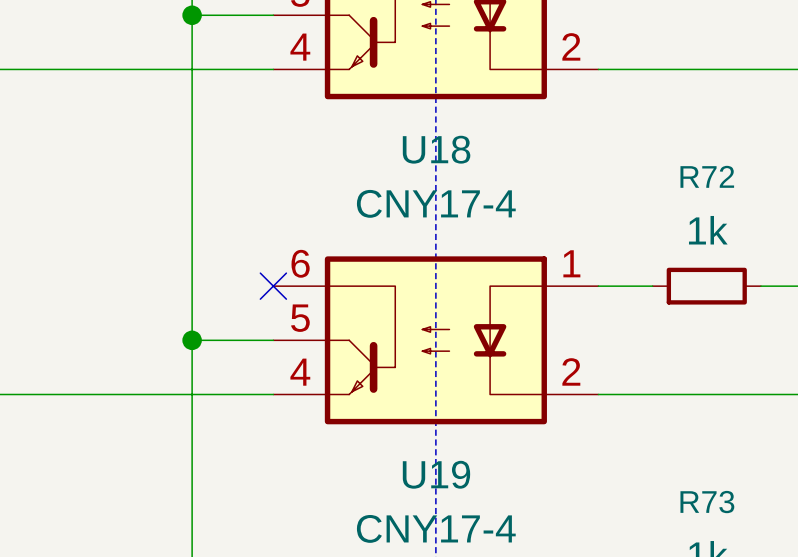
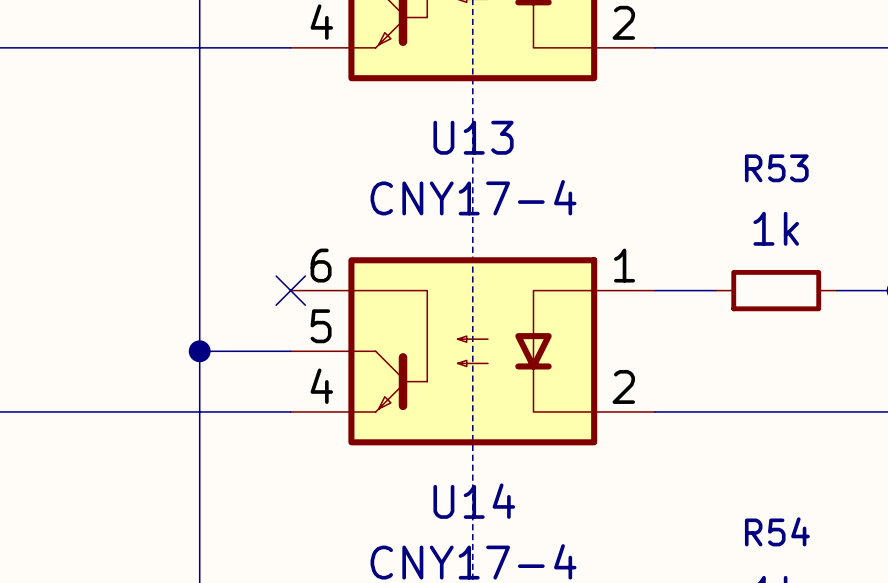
U18 name: U18 (436, 149) -> U13 (473, 137)
R72 name: R72 (707, 176) -> R53 (776, 168)
U19 name: U19 (436, 474) -> U14 (474, 501)
R73 name: R73 (707, 502) -> R54 (777, 531)

